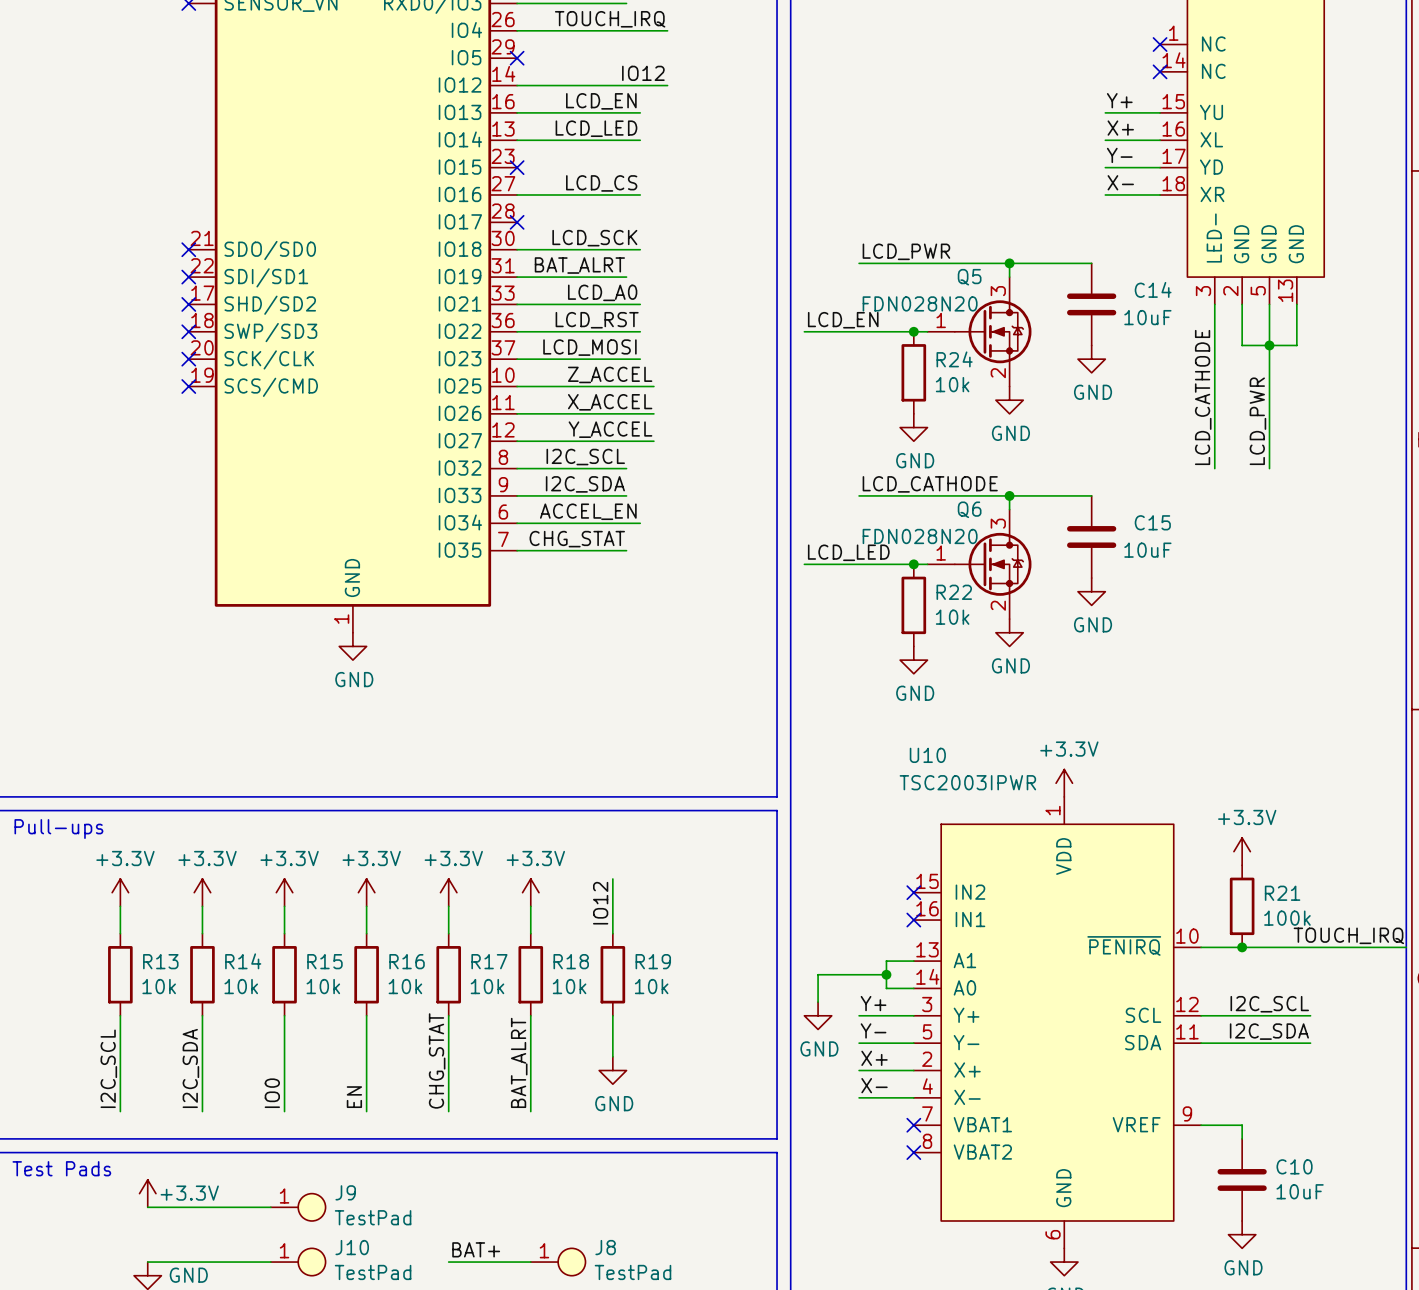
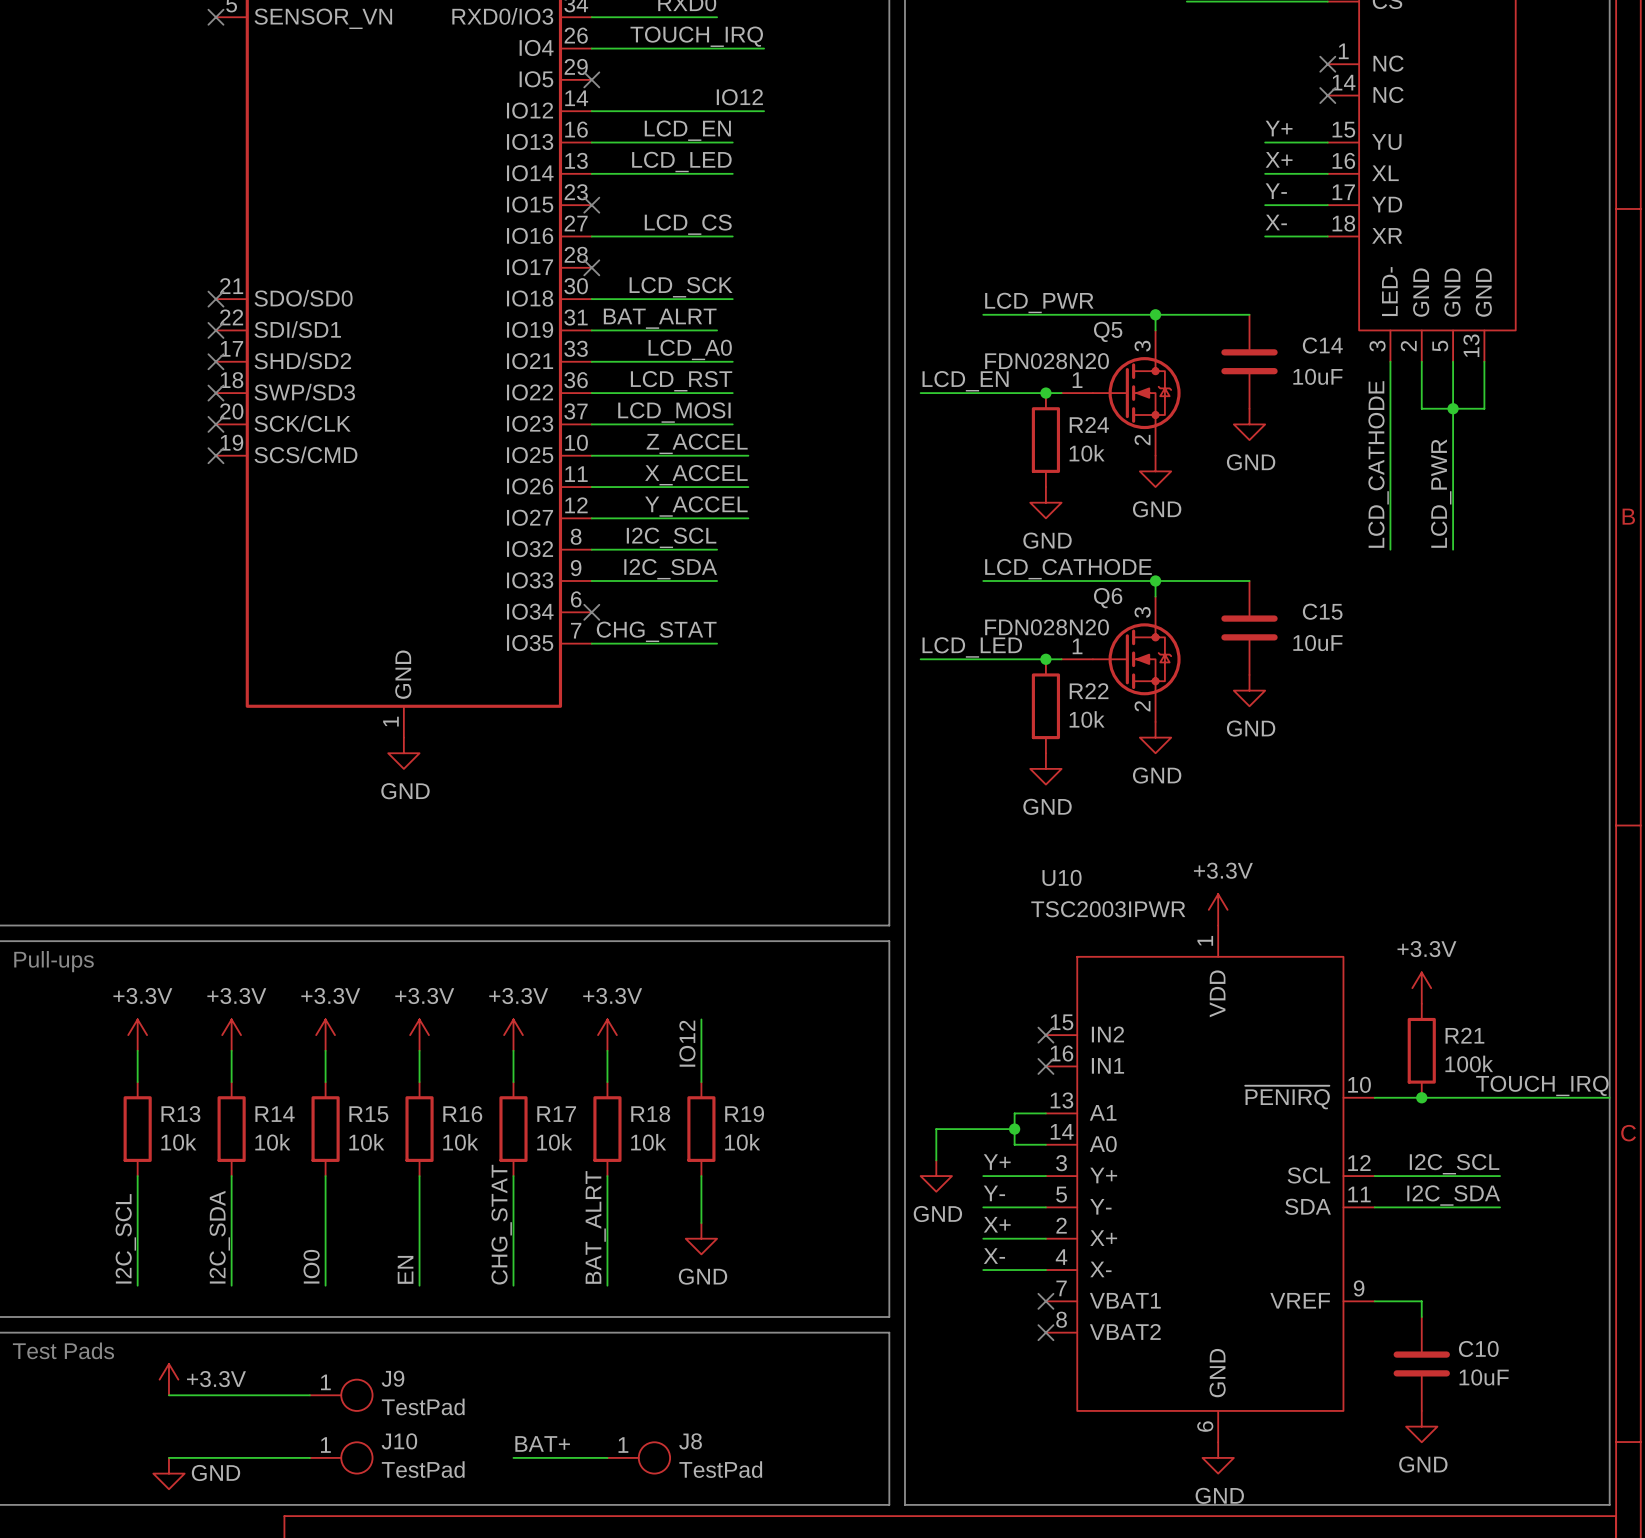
label: ACCEL_EN (588, 511) -> none
wire: (517, 523) (640, 523) -> none
no-connect mark: none -> (591, 612)

